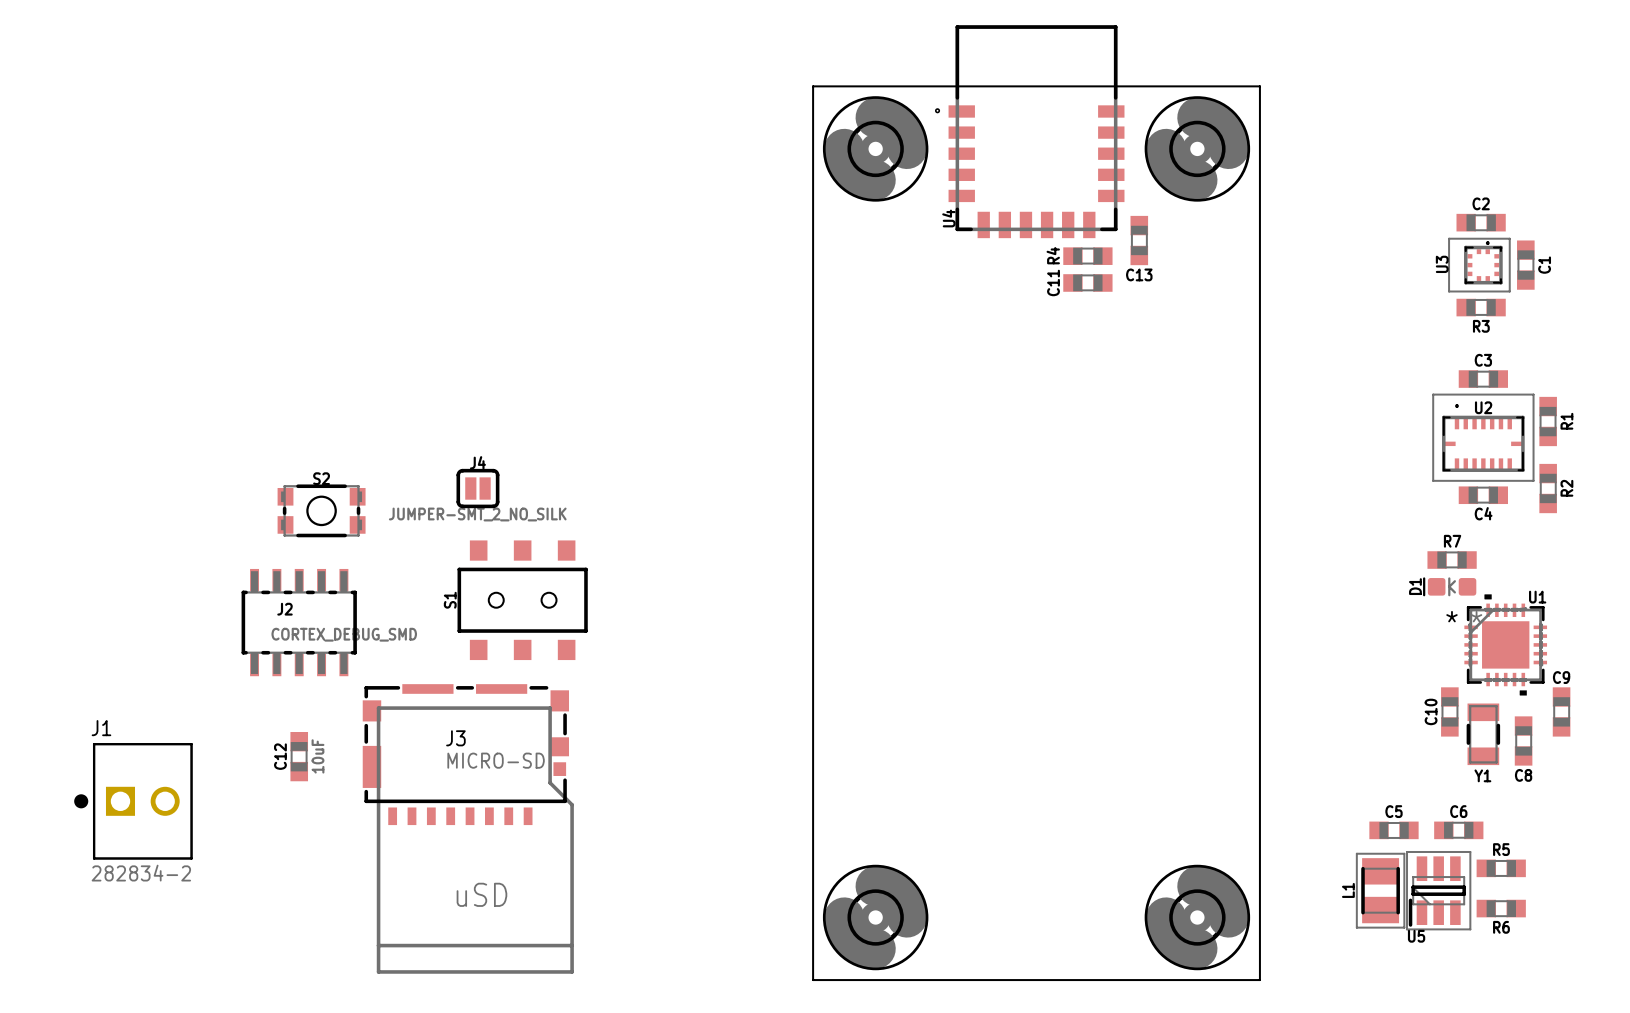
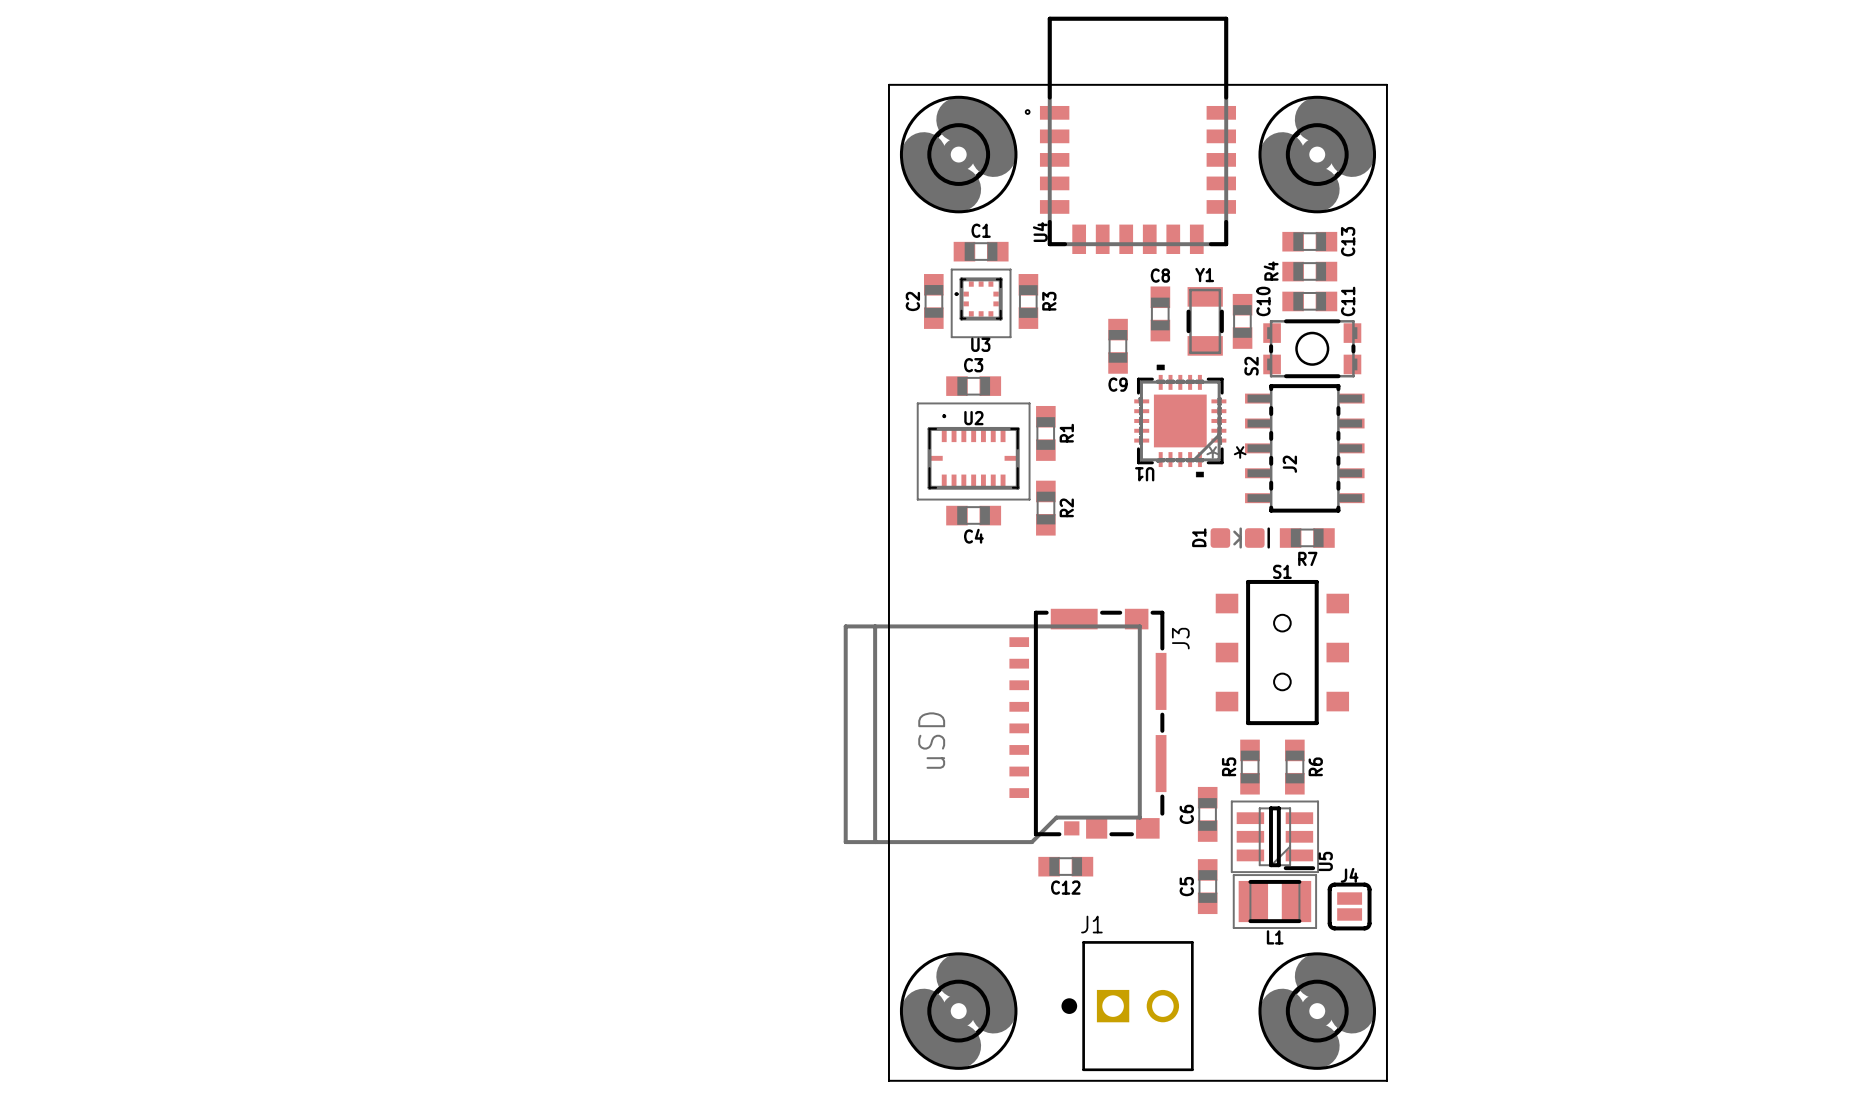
C2 rotation: 0° (1481, 222) -> 90° clockwise (933, 301)
C2 position: (1481, 222) -> (933, 301)
C13 rotation: 0° (1139, 240) -> 90° clockwise (1309, 241)
C13 position: (1139, 240) -> (1309, 241)
R4 position: (1087, 256) -> (1309, 271)
U3 rotation: 0° (1479, 265) -> 90° counterclockwise (981, 303)
U3 position: (1479, 265) -> (981, 303)
C1 rotation: 0° (1525, 265) -> 90° clockwise (981, 251)
C1 position: (1525, 265) -> (981, 251)
C13 name position: C13 (1139, 274) -> C13 (1348, 241)
C11 name position: C11 (1053, 282) -> C11 (1348, 301)
C11 position: (1087, 282) -> (1309, 301)
R3 rotation: 0° (1481, 307) -> 90° clockwise (1028, 301)
R3 position: (1481, 307) -> (1028, 301)
C3 position: (1483, 379) -> (973, 386)
R1 position: (1548, 421) -> (1045, 433)
U2 position: (1483, 437) -> (973, 451)
S2 name rotation: 0° (321, 478) -> 90° counterclockwise (1251, 366)
S2 name position: S2 (321, 478) -> S2 (1251, 366)
J4 rotation: 0° (477, 488) -> 90° clockwise (1349, 906)
J4 position: (477, 488) -> (1349, 906)
R2 position: (1548, 488) -> (1045, 508)
C4 position: (1483, 495) -> (973, 515)
S2 position: (321, 510) -> (1312, 348)
J4 value: JUMPER-SMT_2_NO_SILK (477, 514) -> none
R7 name position: R7 (1452, 541) -> R7 (1307, 558)
R7 position: (1452, 560) -> (1307, 538)
D1 rotation: 0° (1449, 586) -> 180° (1240, 538)
D1 position: (1449, 586) -> (1240, 538)
S1 rotation: 0° (522, 600) -> 90° clockwise (1282, 652)
S1 position: (522, 600) -> (1282, 652)
J2 rotation: 0° (299, 622) -> 90° clockwise (1304, 448)
J2 position: (299, 622) -> (1304, 448)
J2 value: CORTEX_DEBUG_SMD (344, 634) -> none
U1 rotation: 0° (1505, 644) -> 180° (1180, 420)
U1 position: (1505, 644) -> (1180, 420)
C9 name position: C9 (1561, 677) -> C9 (1118, 384)
J3 footprint: [362, 684, 574, 974] -> [843, 608, 1167, 845]
C10 name position: C10 (1431, 711) -> C10 (1263, 301)
C10 position: (1449, 711) -> (1242, 321)
C9 position: (1561, 711) -> (1118, 346)
Y1 position: (1483, 734) -> (1205, 321)
J3 name position: J3 (455, 738) -> J3 (1180, 638)
C8 position: (1523, 740) -> (1160, 313)
C12 rotation: 0° (299, 756) -> 90° clockwise (1065, 866)
C12 position: (299, 756) -> (1065, 866)
C12 value: 10uF (317, 756) -> none
J3 value: MICRO-SD (496, 760) -> none
Y1 name position: Y1 (1482, 775) -> Y1 (1204, 275)
C8 name position: C8 (1523, 775) -> C8 (1160, 275)
J1 position: (133, 801) -> (1127, 1006)
C5 rotation: 0° (1393, 830) -> 90° clockwise (1207, 886)
C5 position: (1393, 830) -> (1207, 886)
C6 rotation: 0° (1458, 830) -> 90° clockwise (1207, 814)
C6 position: (1458, 830) -> (1207, 814)
R5 rotation: 0° (1501, 868) -> 90° clockwise (1250, 767)
R5 position: (1501, 868) -> (1250, 767)
J1 value: 282834-2 (141, 873) -> none
L1 name position: L1 (1348, 890) -> L1 (1275, 937)
L1 rotation: 0° (1380, 890) -> 90° clockwise (1274, 901)
L1 position: (1380, 890) -> (1274, 901)
U5 rotation: 0° (1438, 890) -> 90° counterclockwise (1274, 836)
U5 position: (1438, 890) -> (1274, 836)
R6 rotation: 0° (1501, 908) -> 90° clockwise (1294, 767)
R6 position: (1501, 908) -> (1294, 767)

